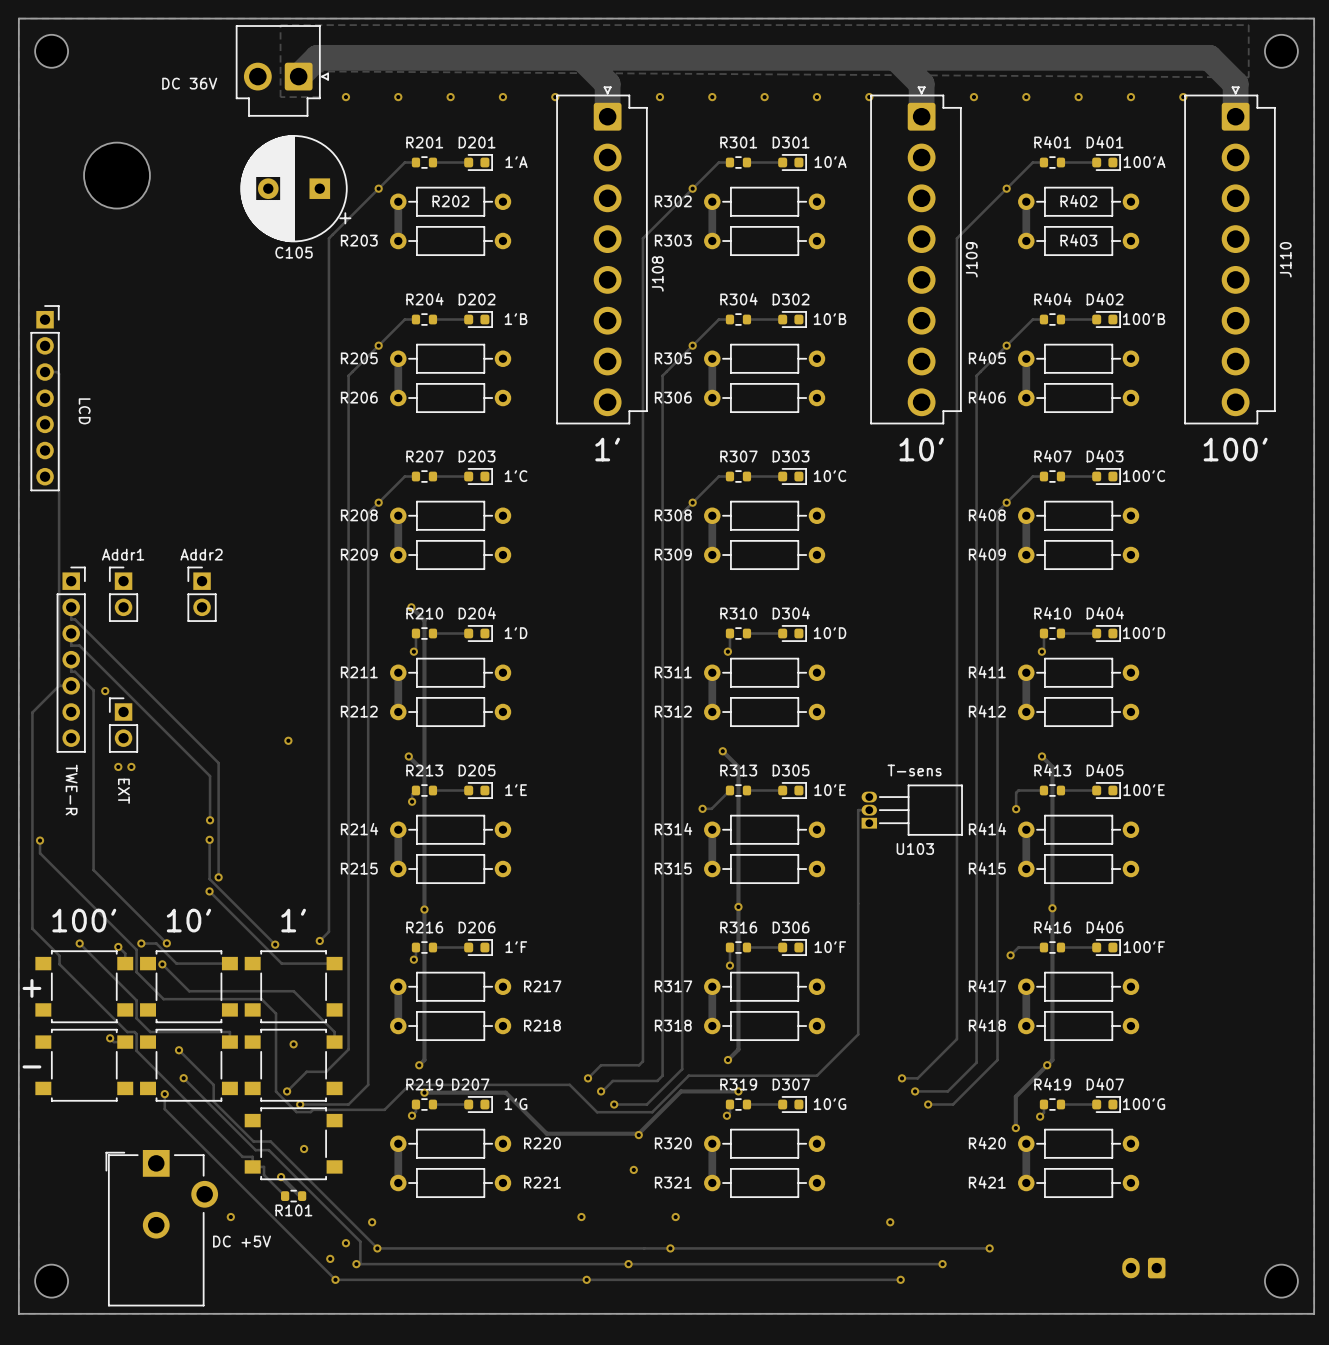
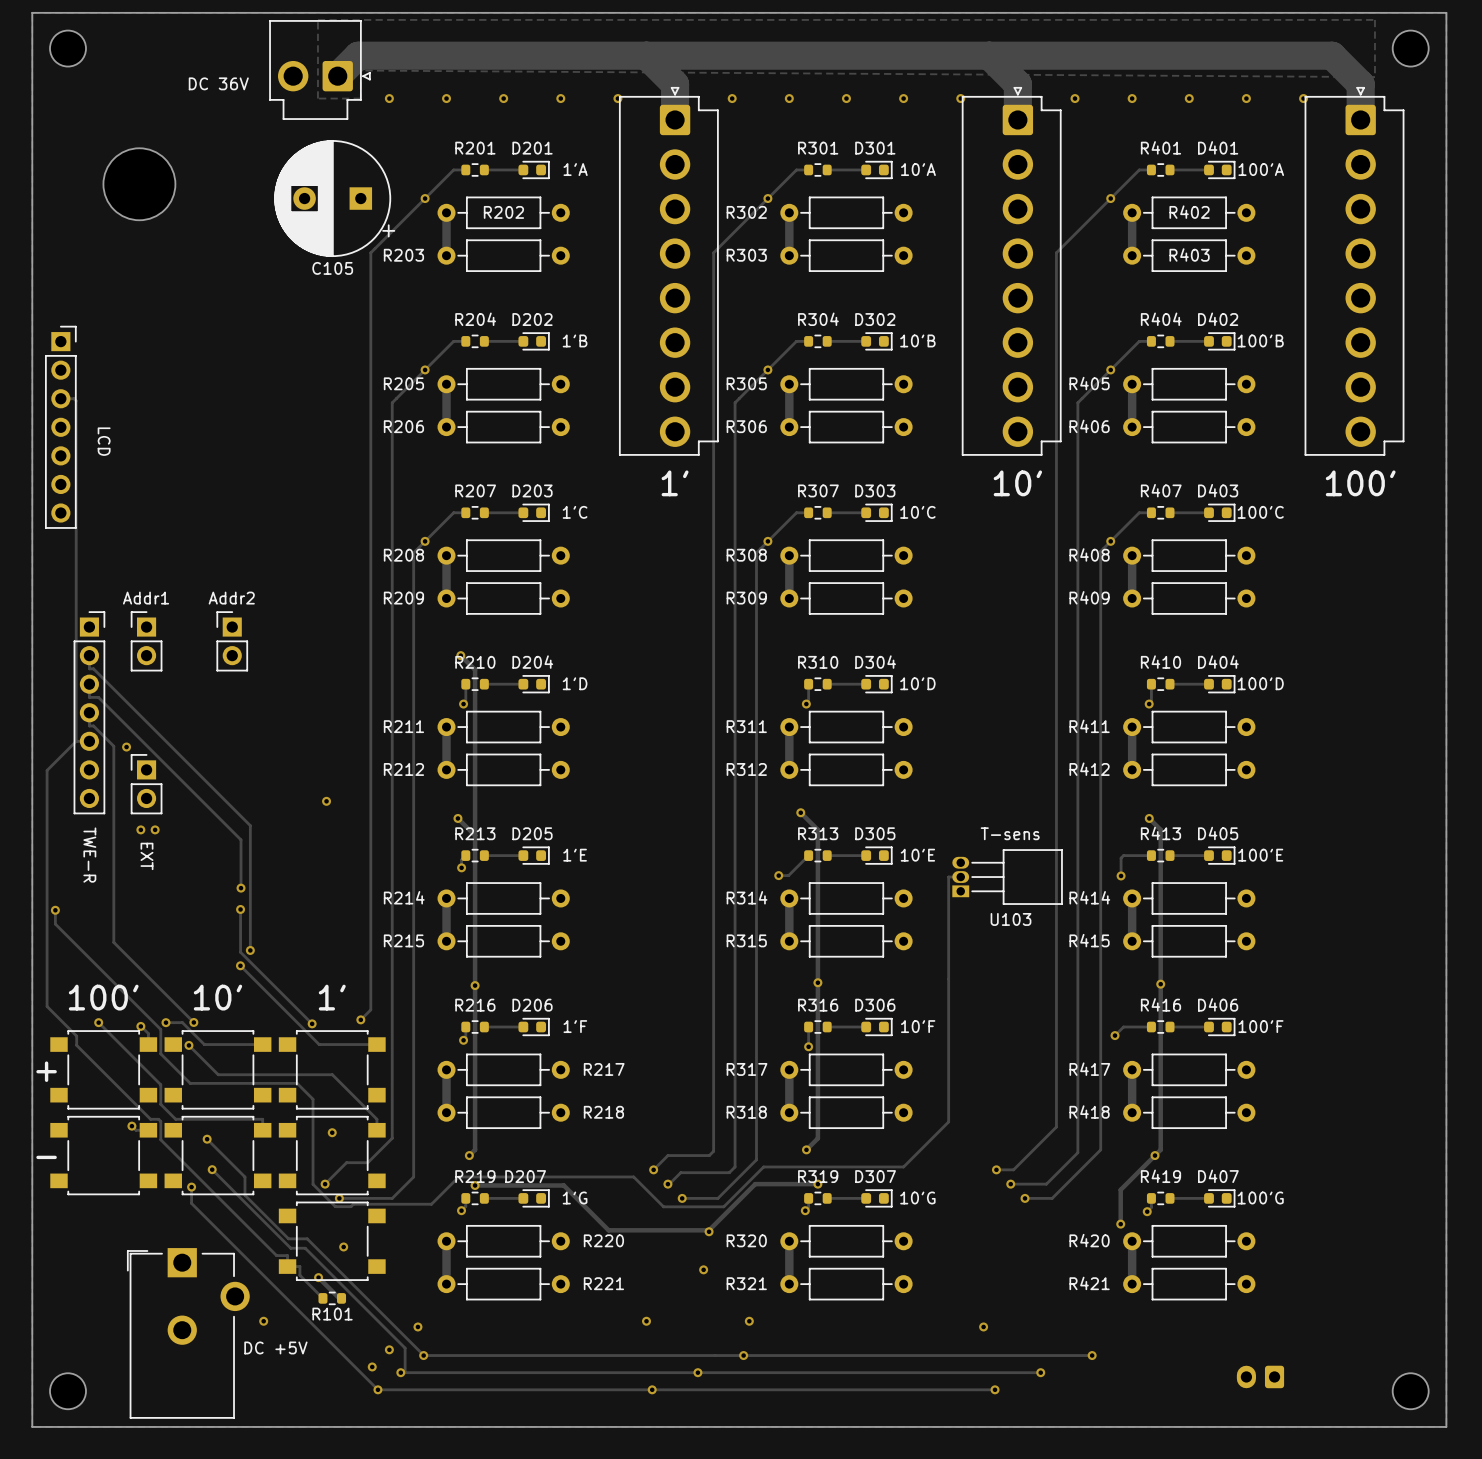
J109 name: J109 (971, 259) -> none
J110 name: J110 (1285, 259) -> none
J108 name: J108 (657, 273) -> none

